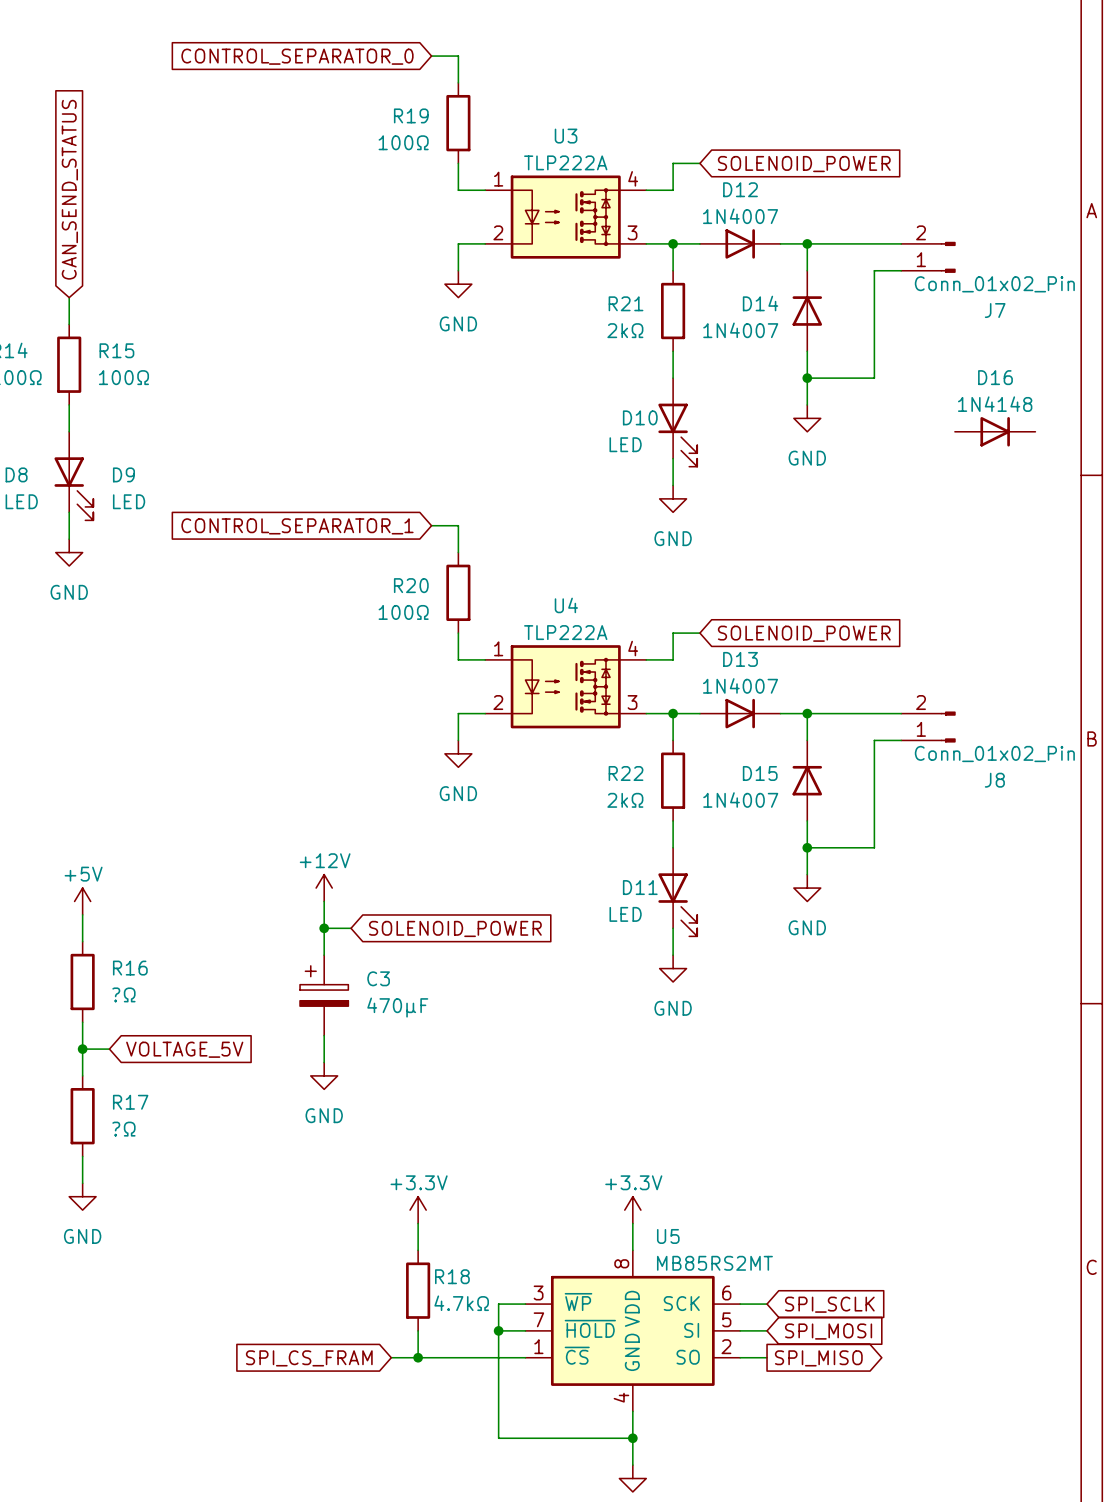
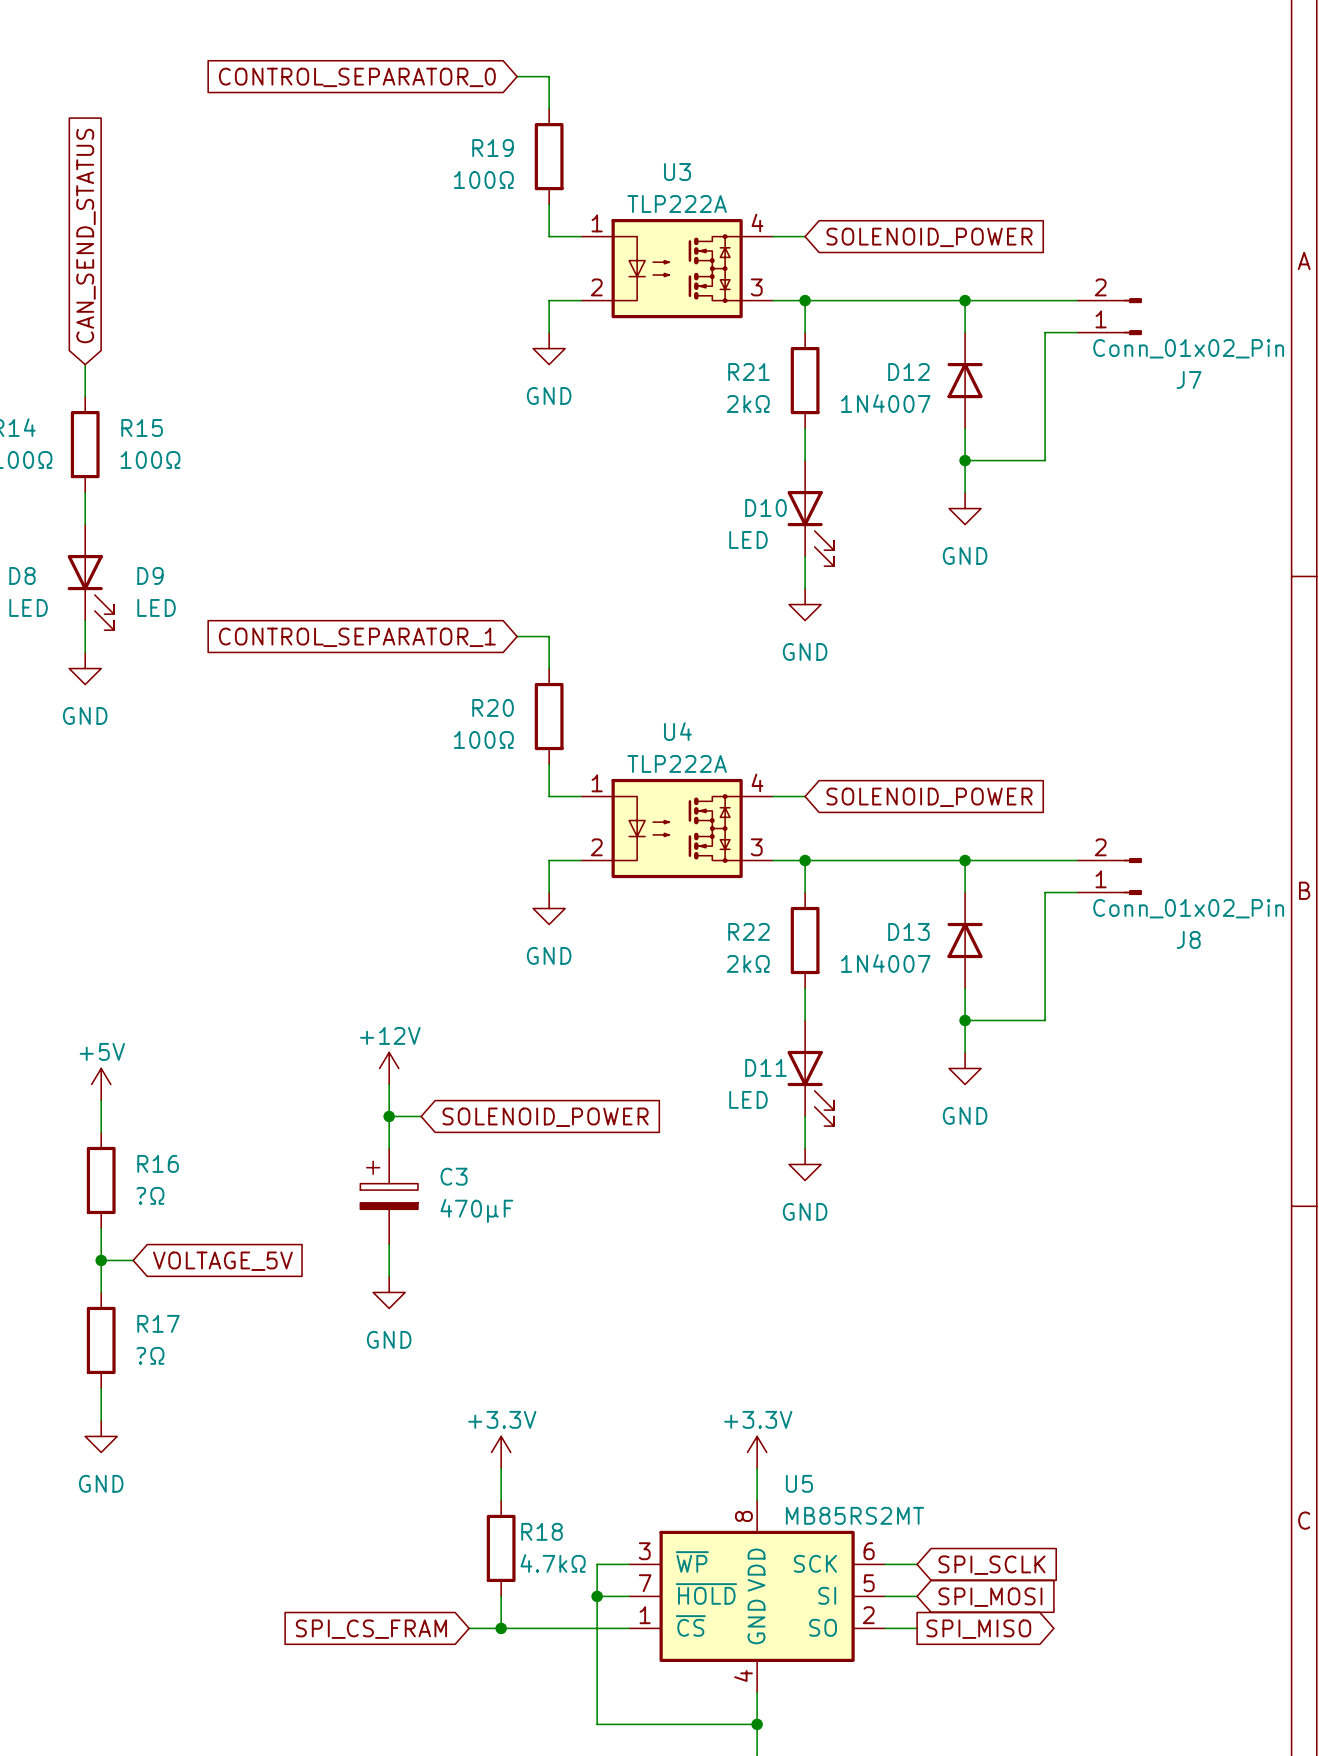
wire: (699, 163) (673, 163) (673, 190) -> none
global label position: SOLENOID_POWER (804, 164) -> SOLENOID_POWER (929, 237)
D12: 1N4007 (740, 243) -> none
D14 name: D14 (760, 303) -> D12 (908, 371)
D16: 1N4148 (995, 431) -> none
wire: (699, 633) (673, 633) (673, 659) -> none
global label position: SOLENOID_POWER (804, 633) -> SOLENOID_POWER (929, 797)
D13: 1N4007 (740, 713) -> none
D15 name: D15 (760, 773) -> D13 (908, 931)

